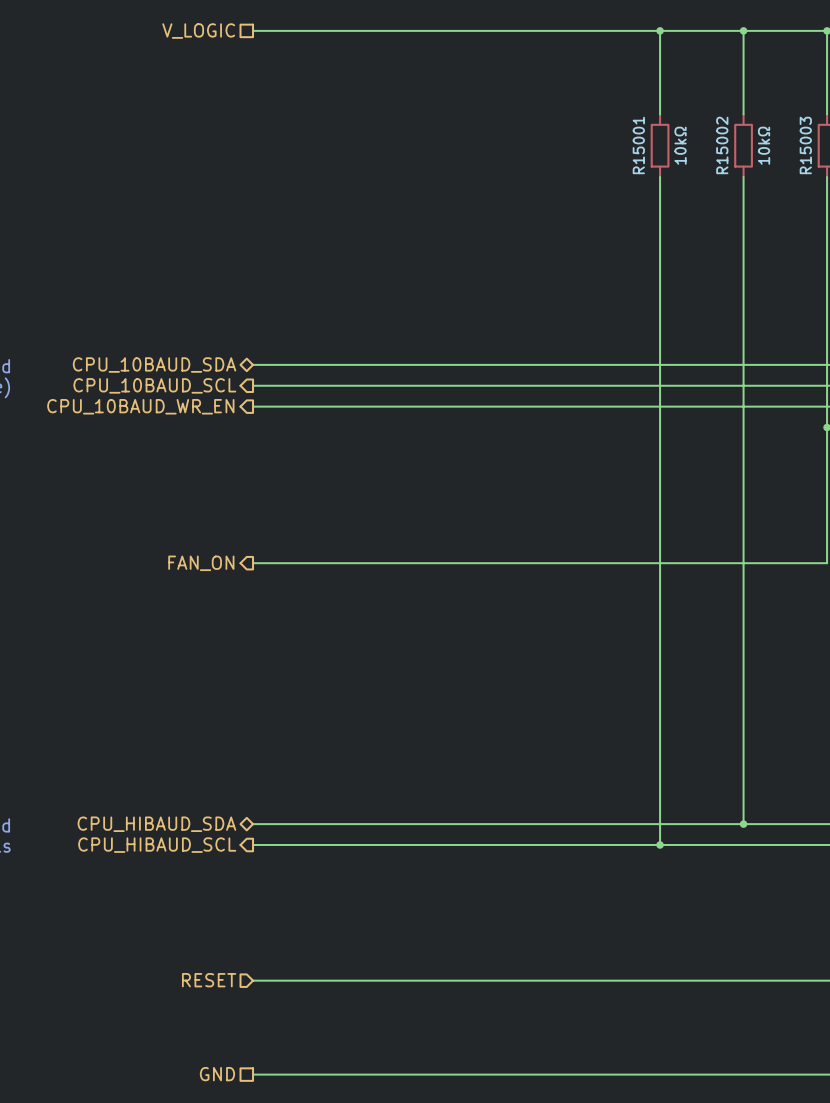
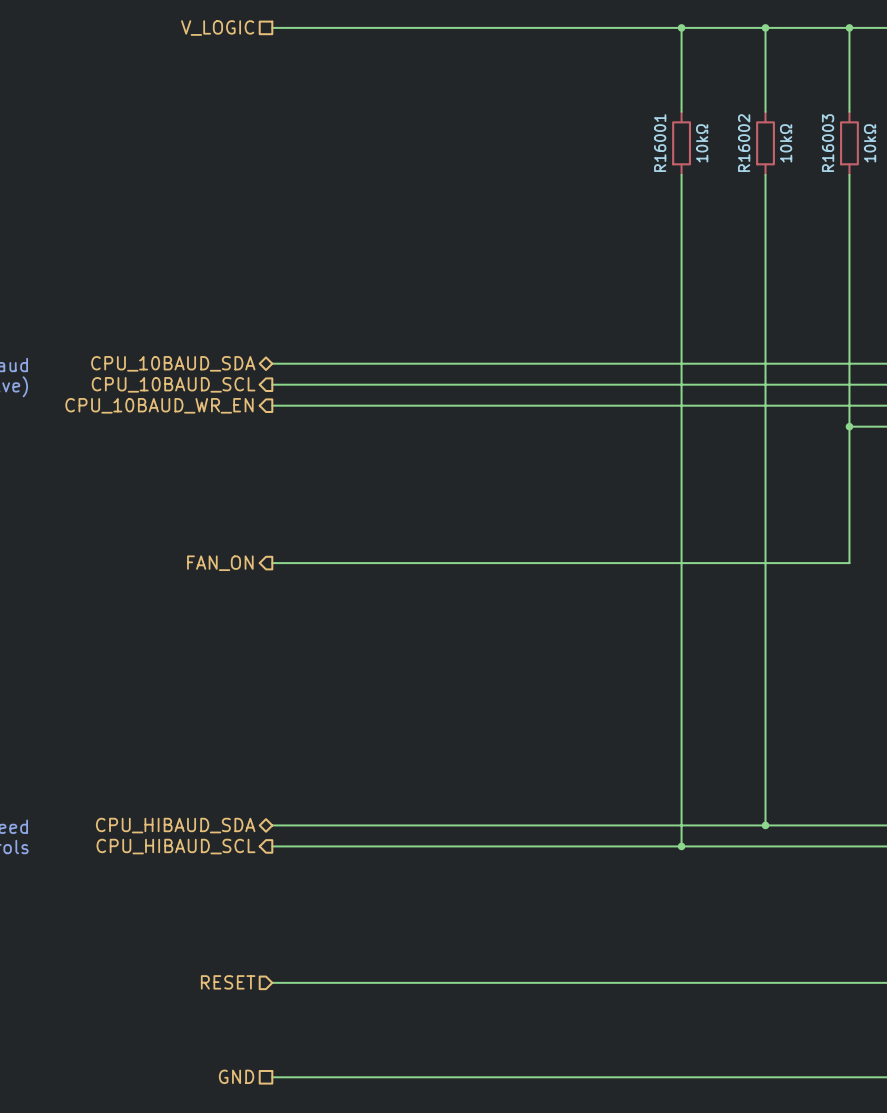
R15001 name: R15001 (638, 145) -> R16001 (660, 143)
R15002 name: R15002 (722, 145) -> R16002 (744, 143)
R15003 name: R15003 (805, 145) -> R16003 (828, 143)

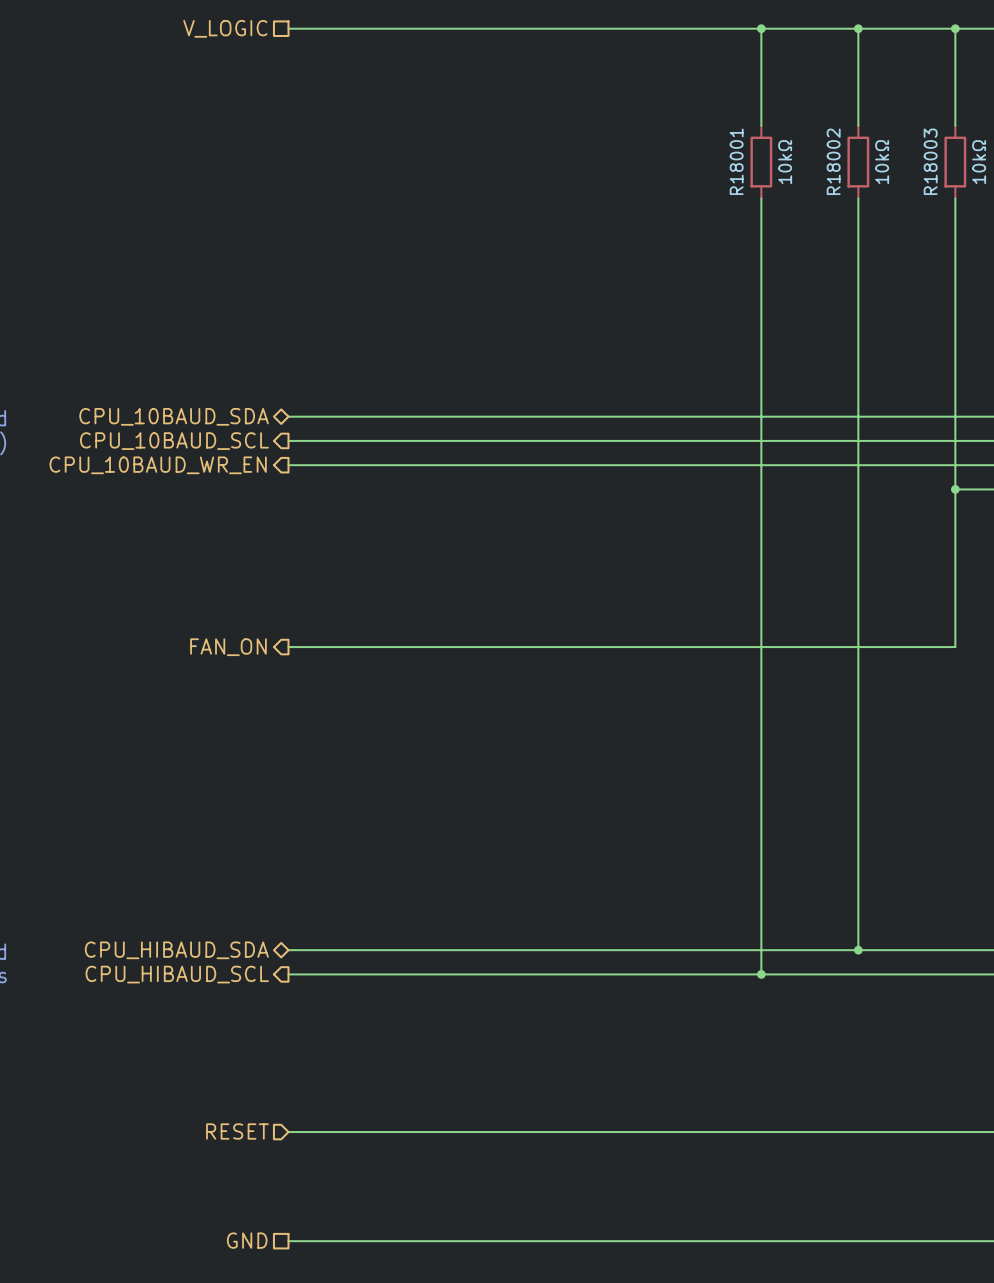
R16001 name: R16001 (660, 143) -> R18001 (736, 161)
R16002 name: R16002 (744, 143) -> R18002 (833, 161)
R16003 name: R16003 (828, 143) -> R18003 (930, 161)

